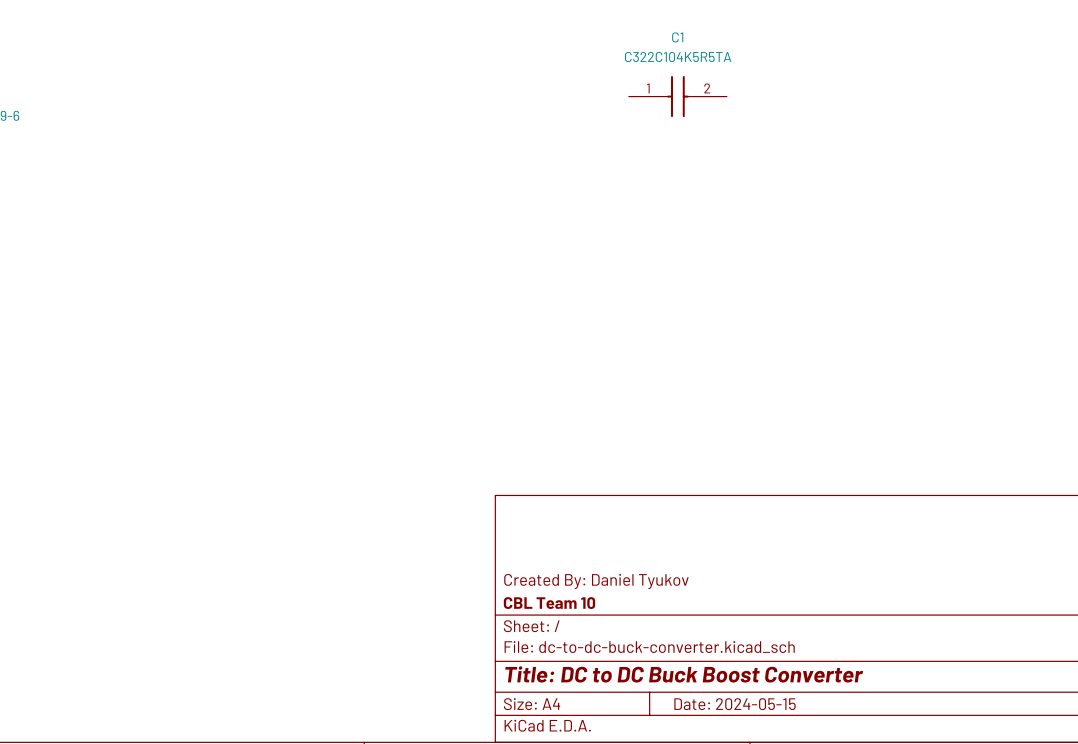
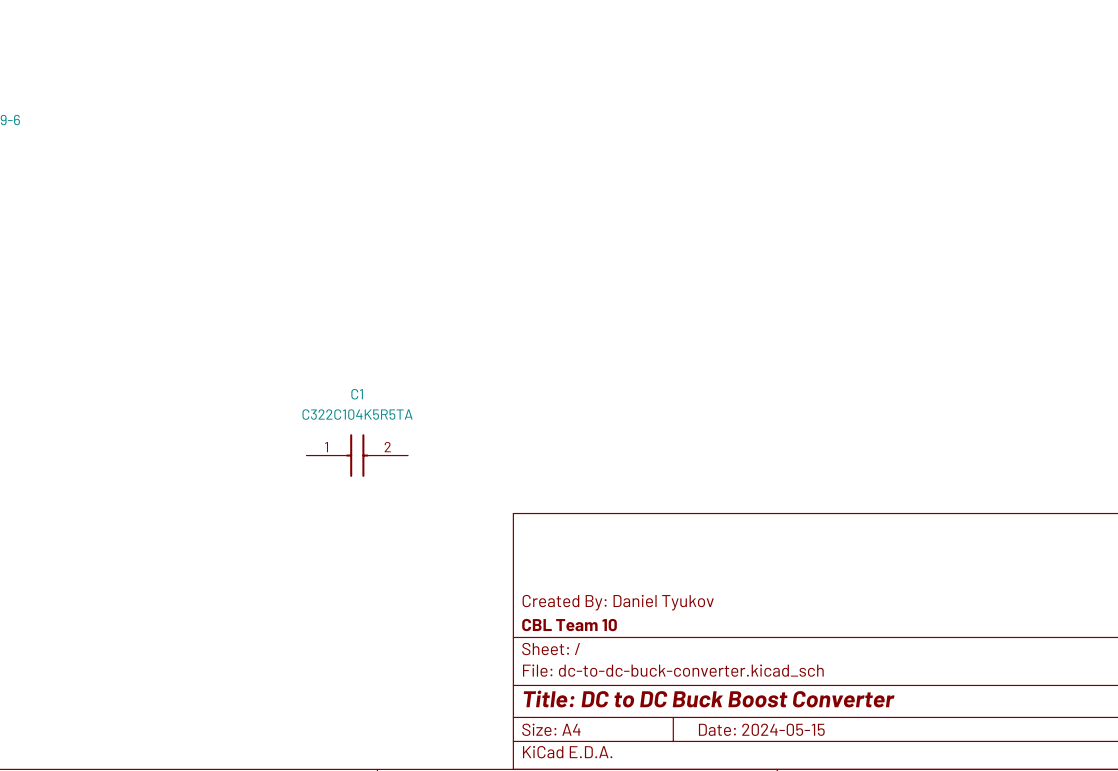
C1 position: (677, 96) -> (357, 455)

